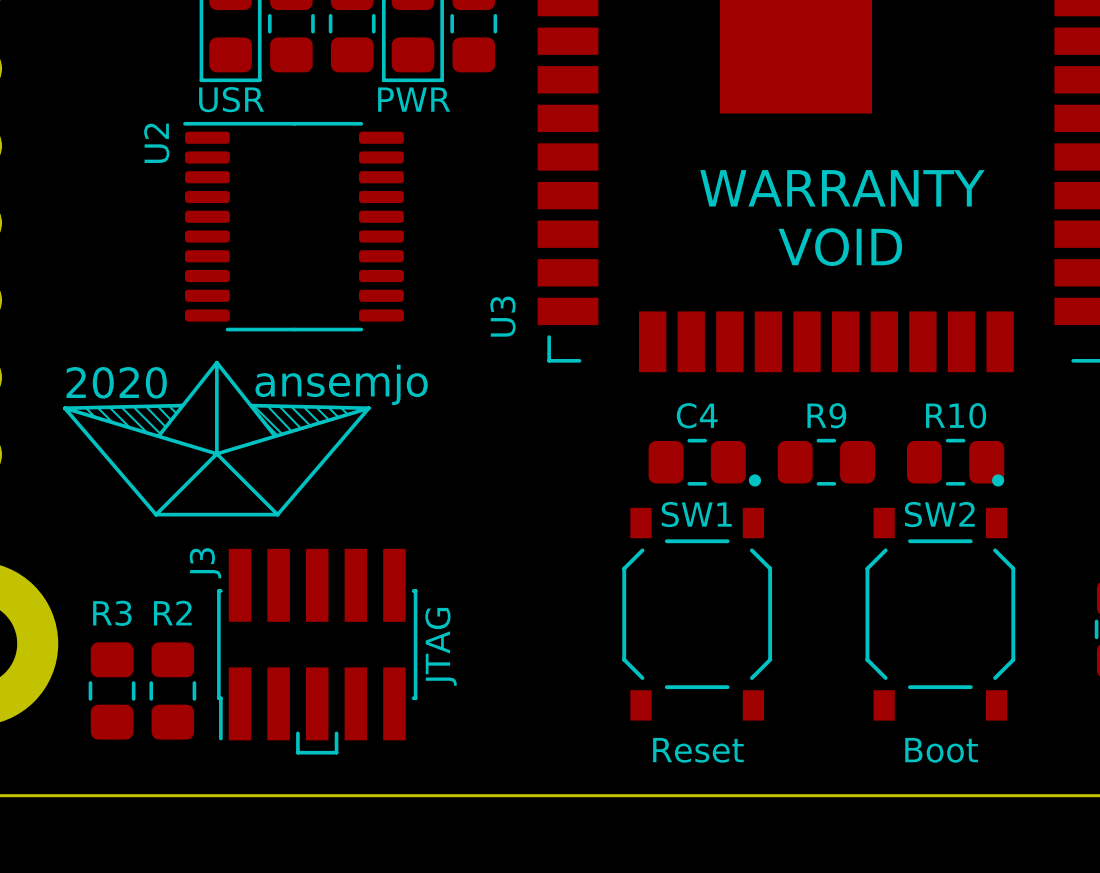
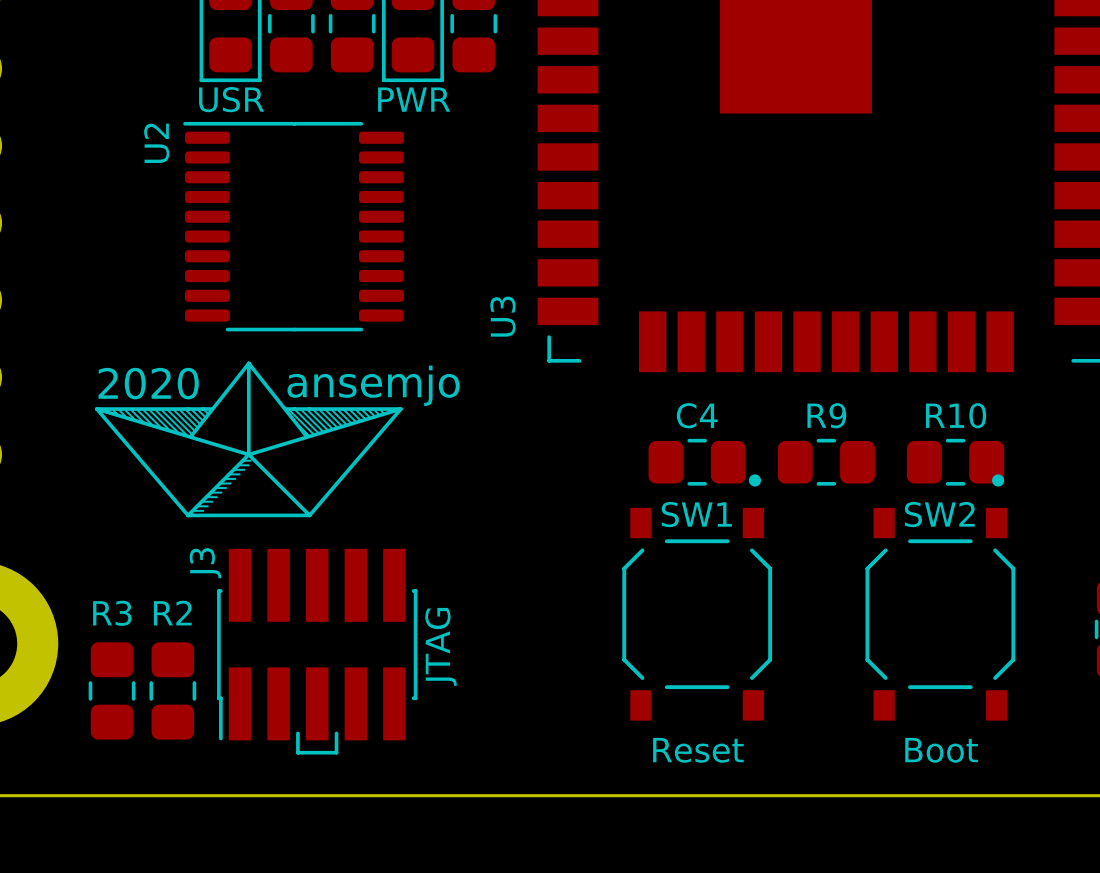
text: WARRANTY (842, 188) -> none
text: VOID (840, 247) -> none
drawing: [63, 360, 371, 517] -> none
drawing: none -> [95, 361, 403, 518]

